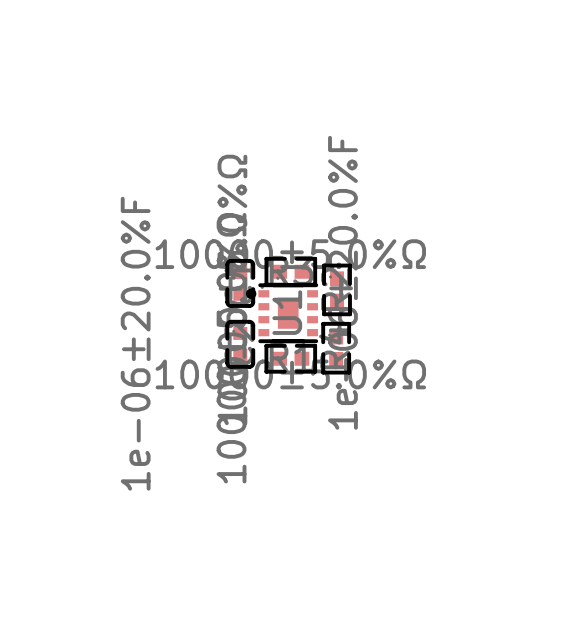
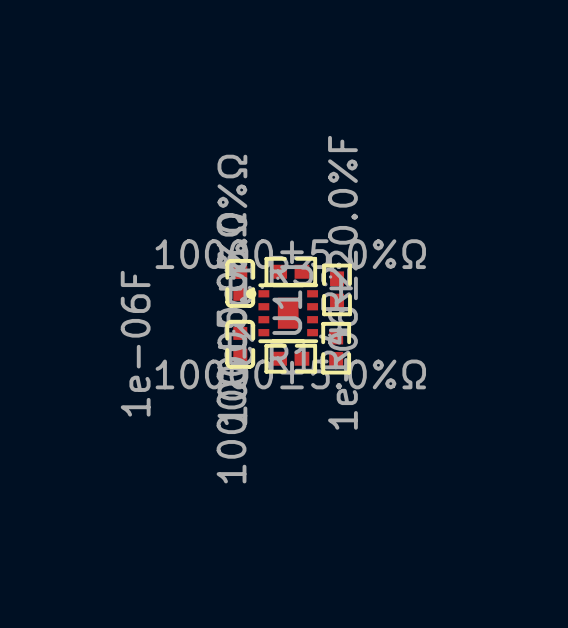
part value: 1e-06±20.0%F (135, 343) -> 1e-06F (135, 343)

